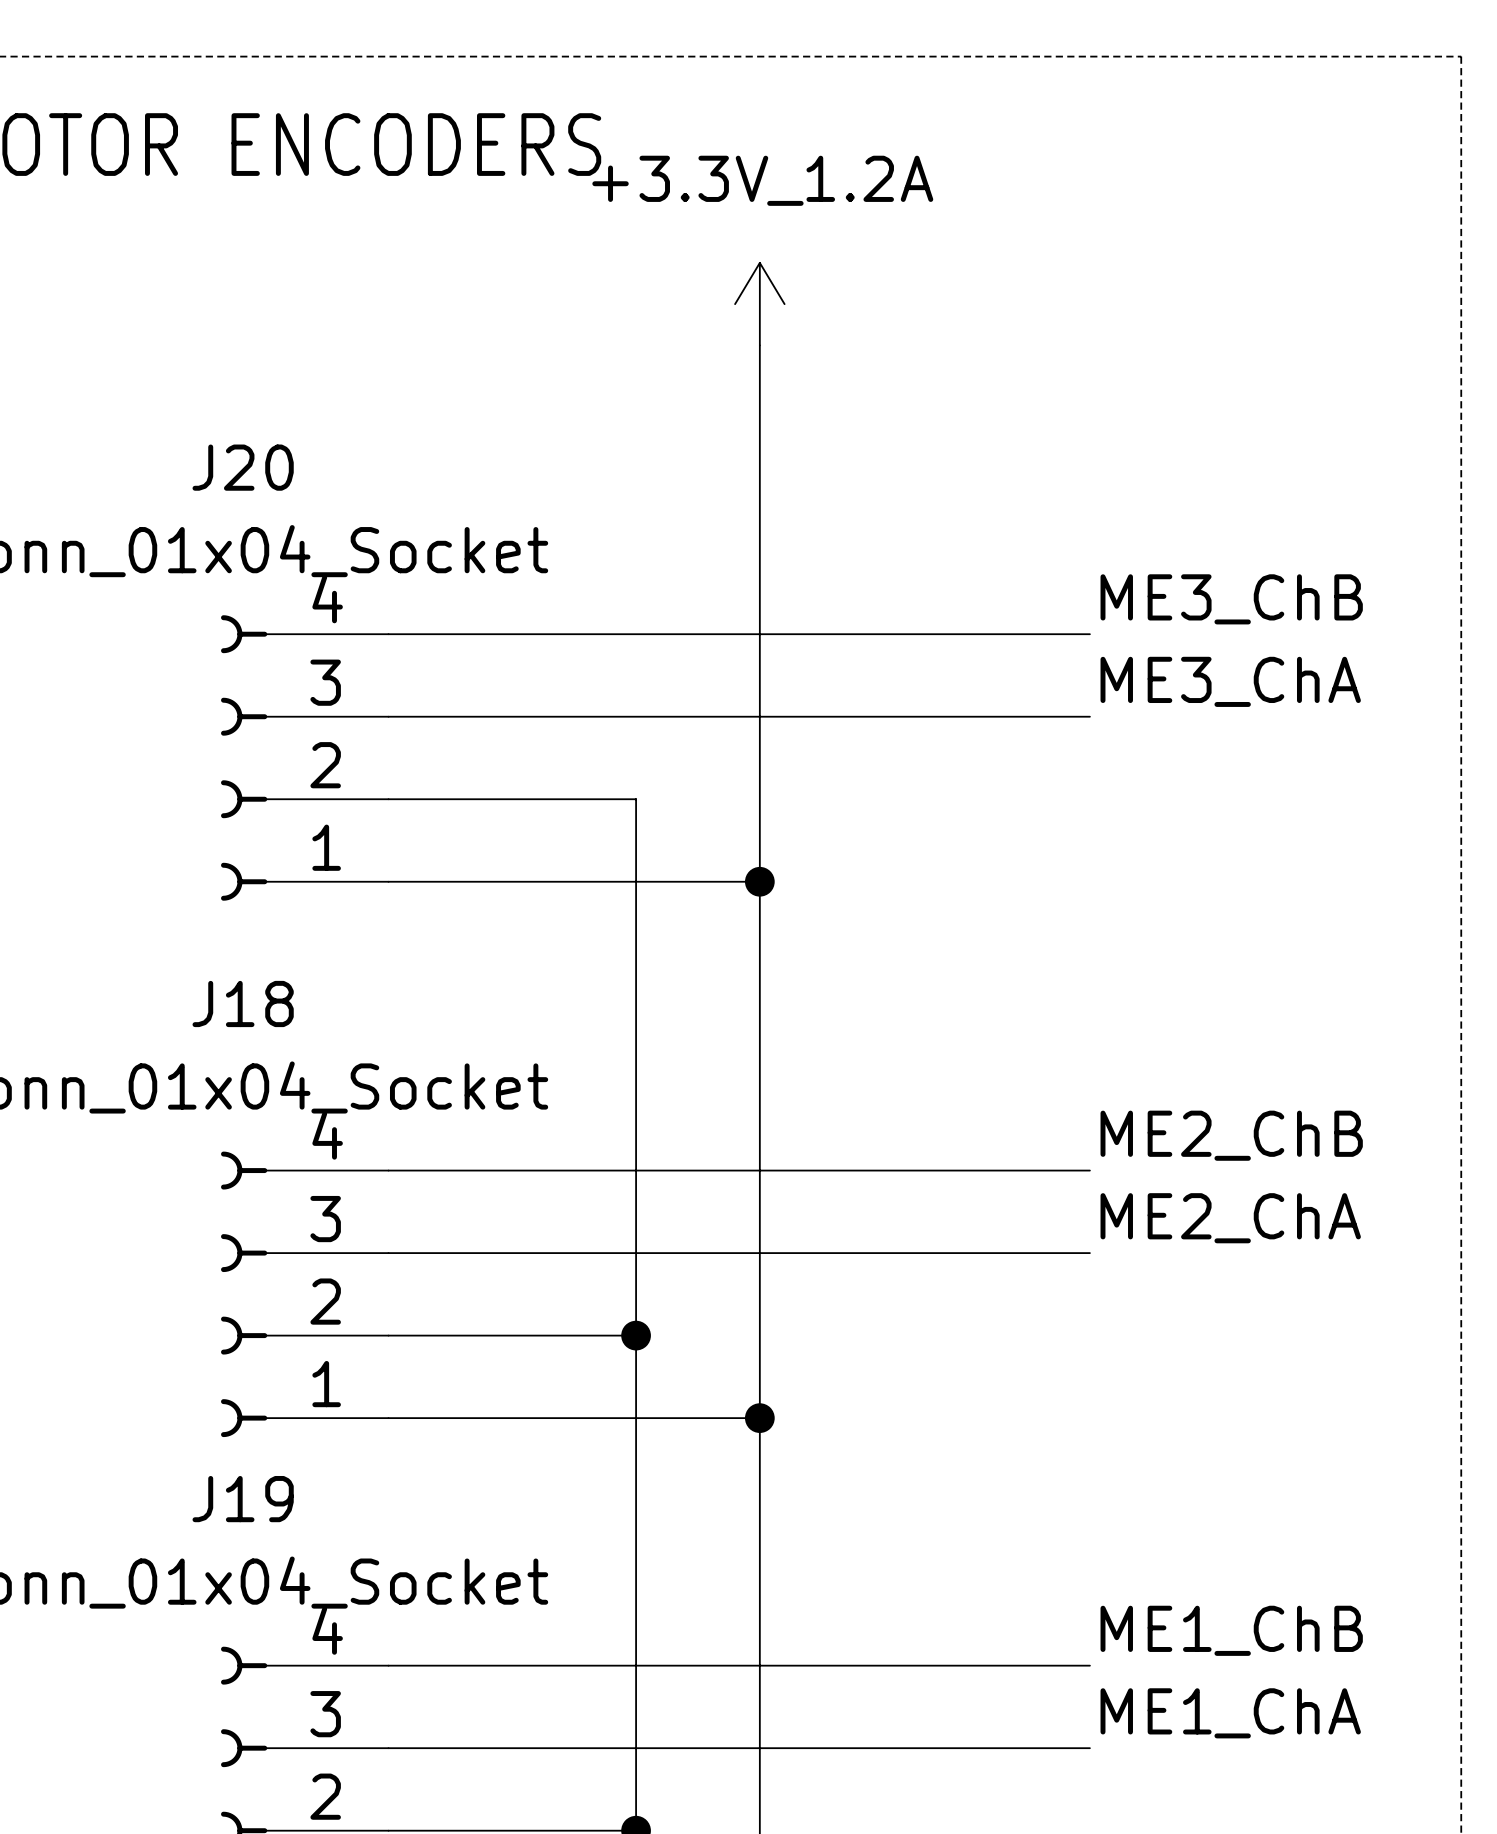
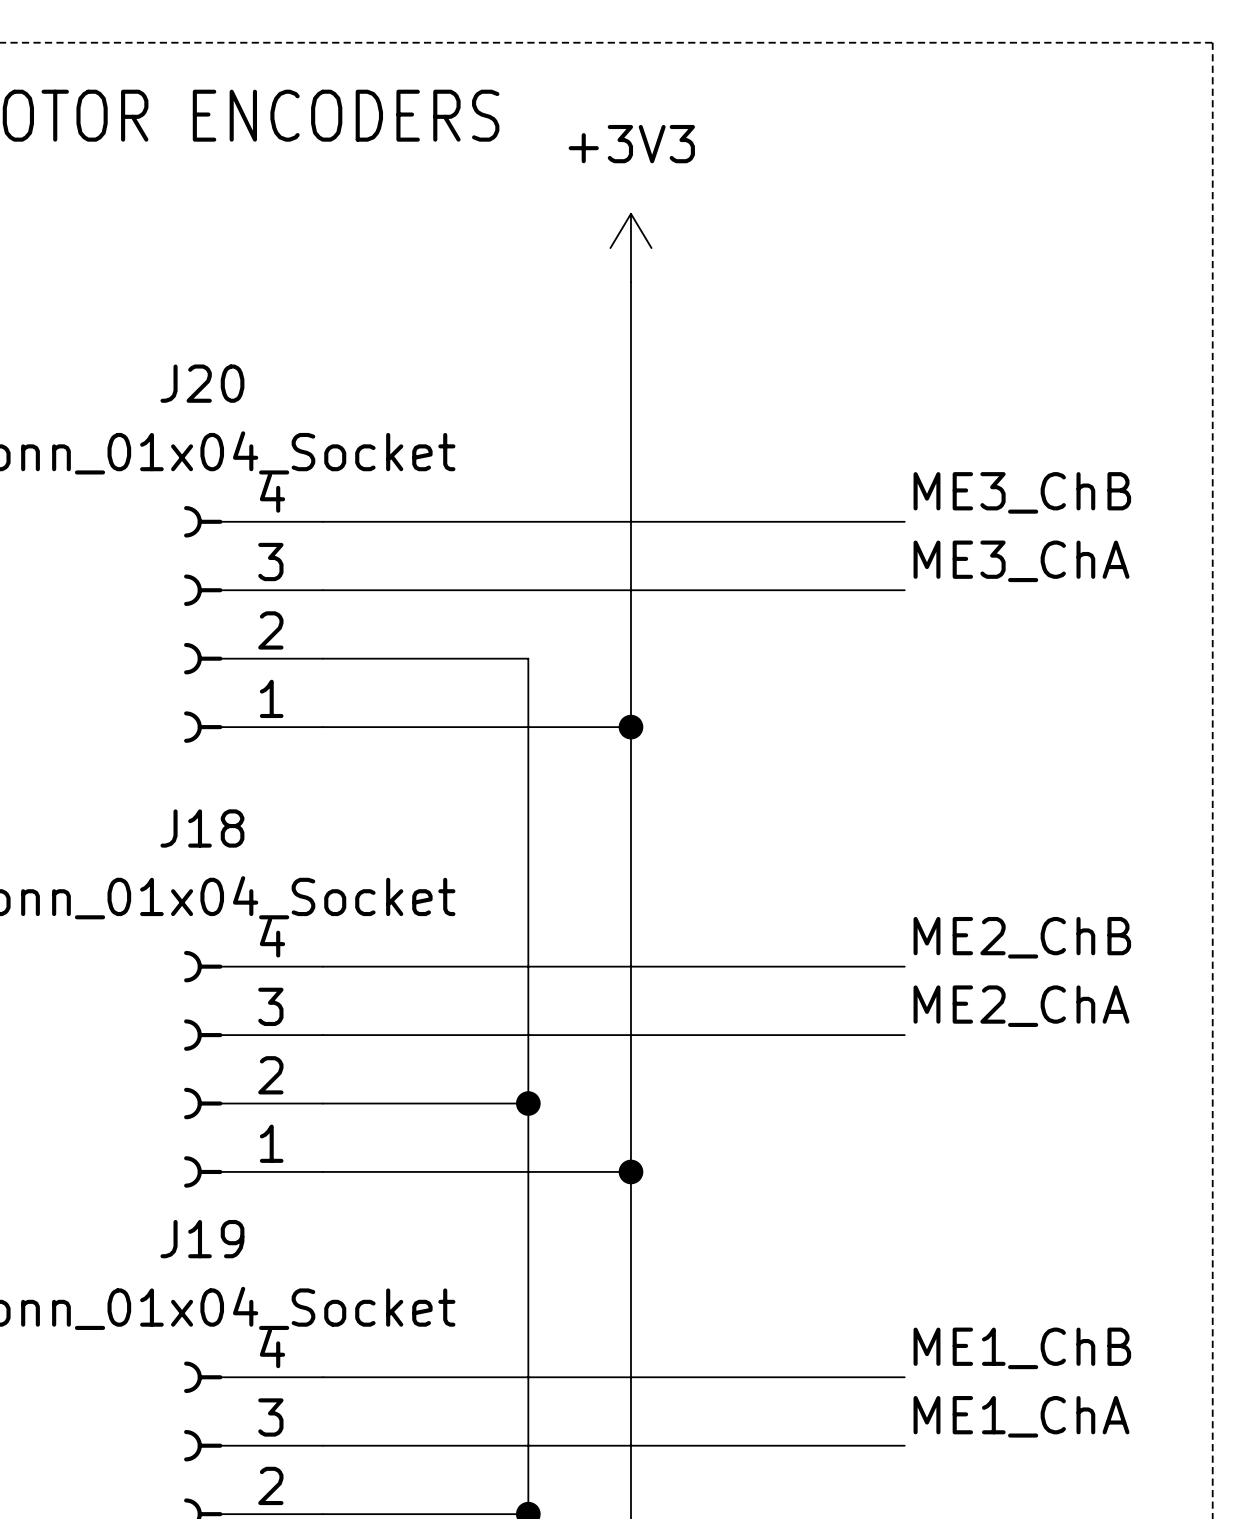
power symbol: +3.3V_1.2A (759, 304) -> +3V3 (630, 248)

